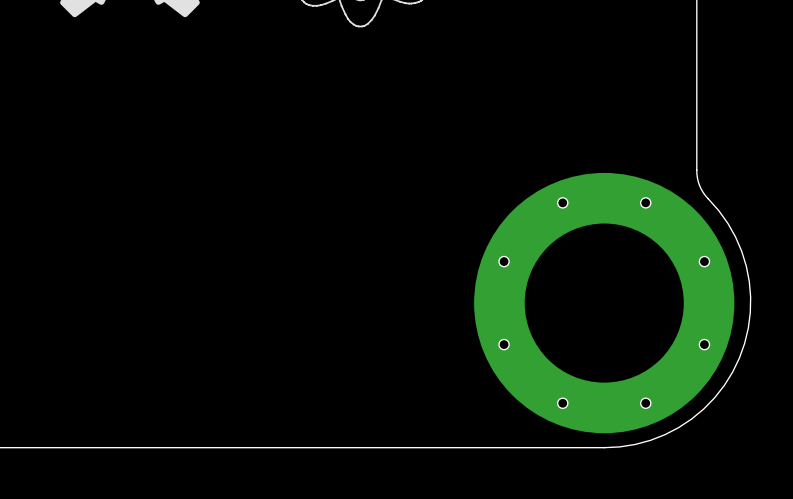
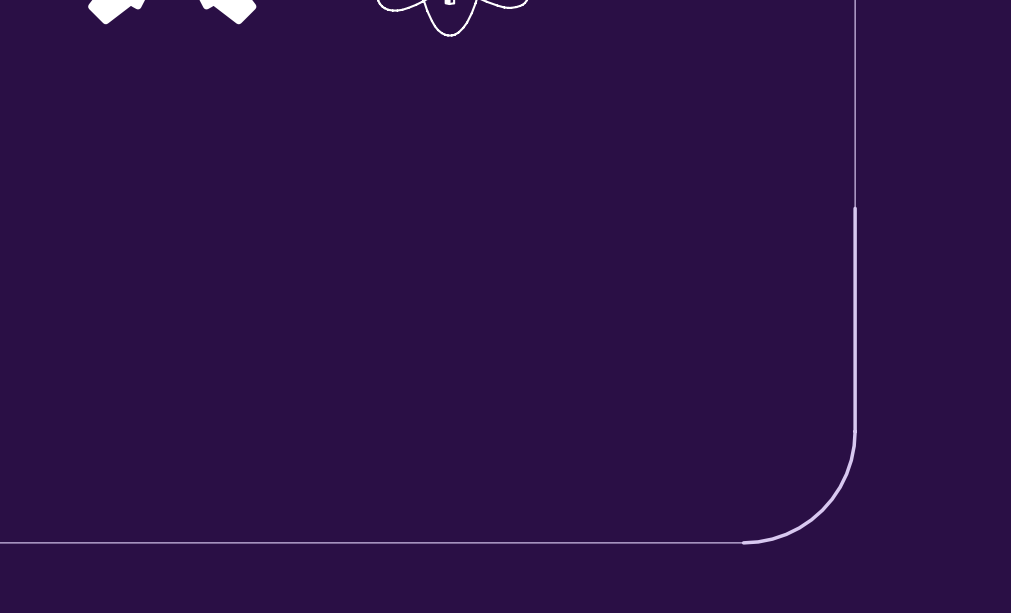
board edge: (696, 170) (701, 189) (727, 223) (735, 236) (746, 266) (749, 281) (750, 312) (744, 343) (739, 358) (724, 385) (703, 408) (691, 418) (678, 427) (650, 440) (619, 446) (604, 447) -> (855, 208) (855, 431) (851, 460) (840, 487) (822, 510) (811, 519) (799, 527) (772, 539) (743, 542)
hole: (562, 202) -> none
hole: (645, 202) -> none
hole: (504, 261) -> none
hole: (704, 261) -> none
part: (604, 303) -> none
hole: (504, 344) -> none
hole: (704, 344) -> none
hole: (562, 403) -> none
hole: (645, 403) -> none

